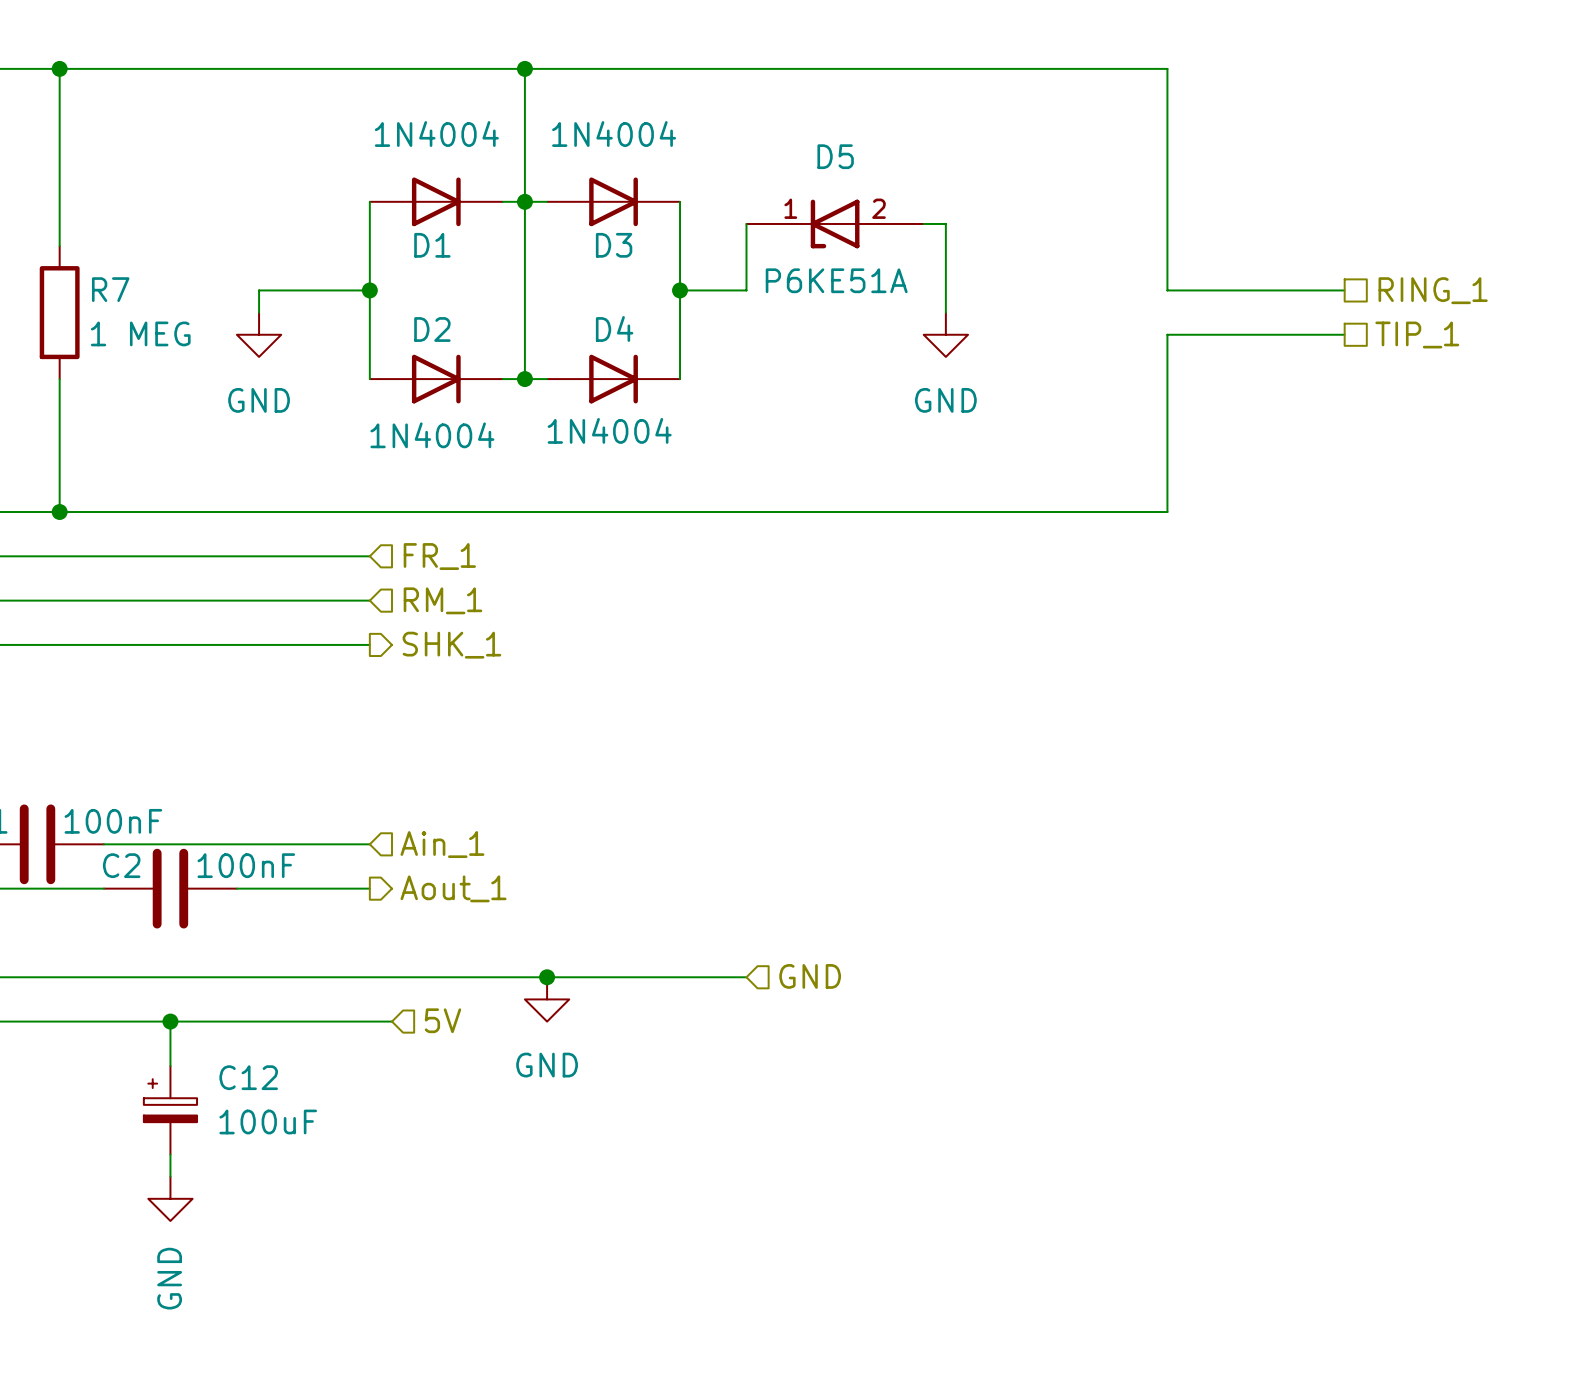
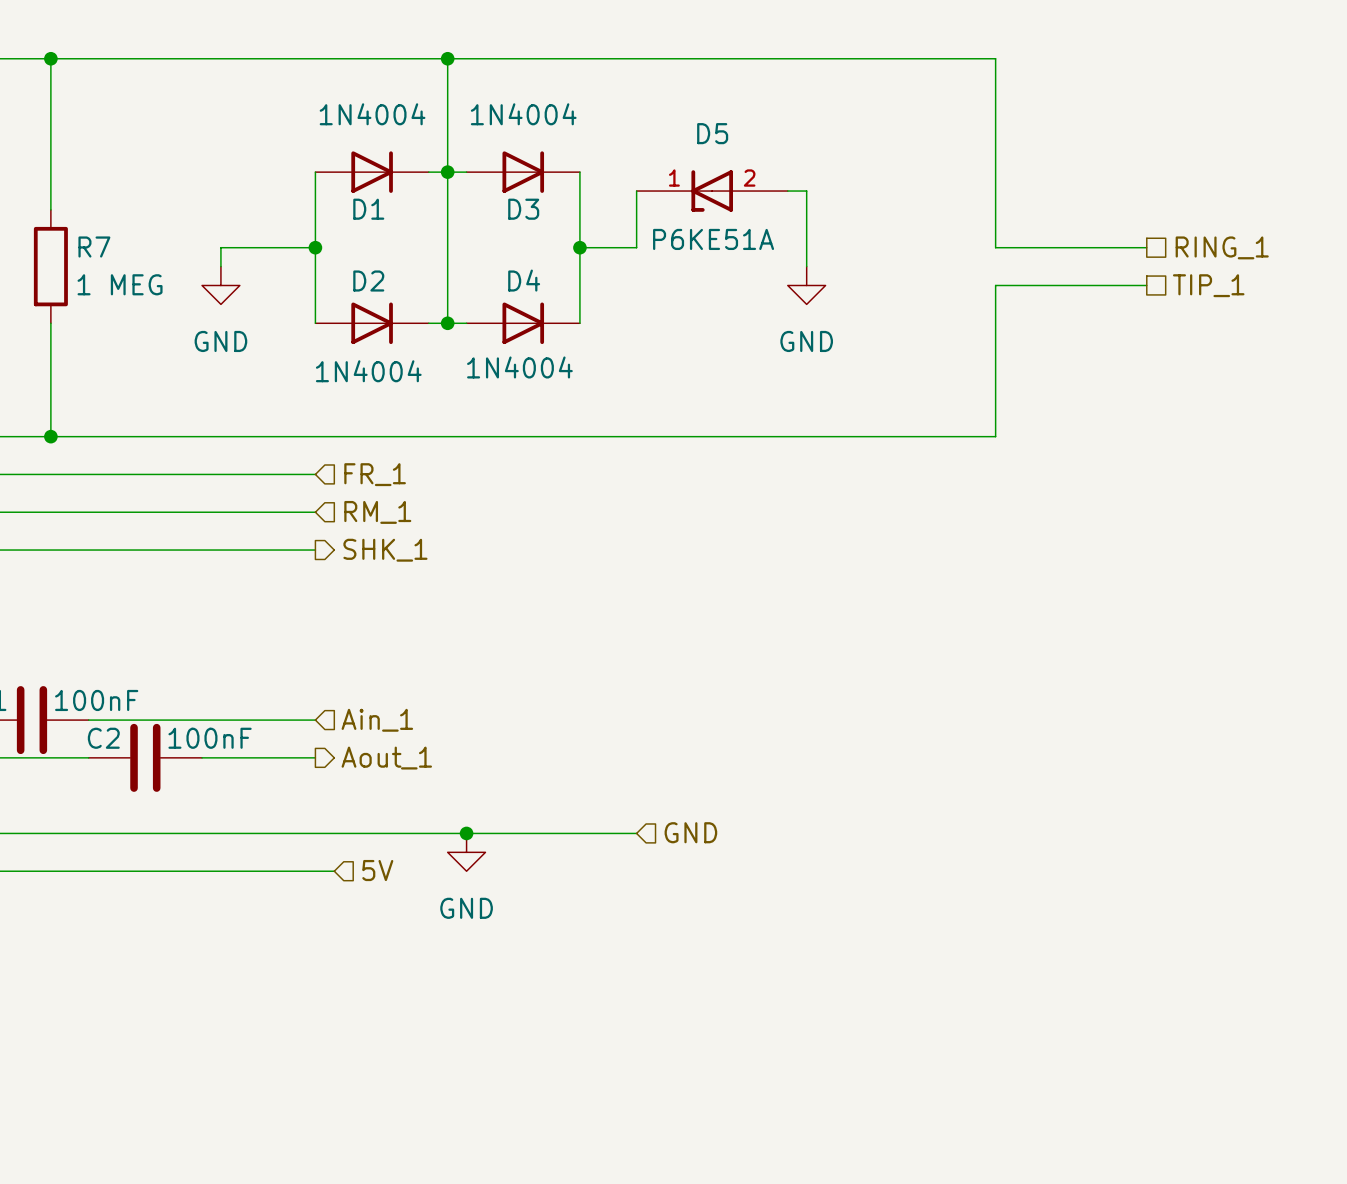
wire: (170, 1021) (170, 1065) -> none
junction: (170, 1021) -> none
C12: 100uF (170, 1110) -> none
wire: (170, 1154) (170, 1176) -> none
power symbol: GND (170, 1198) -> none

